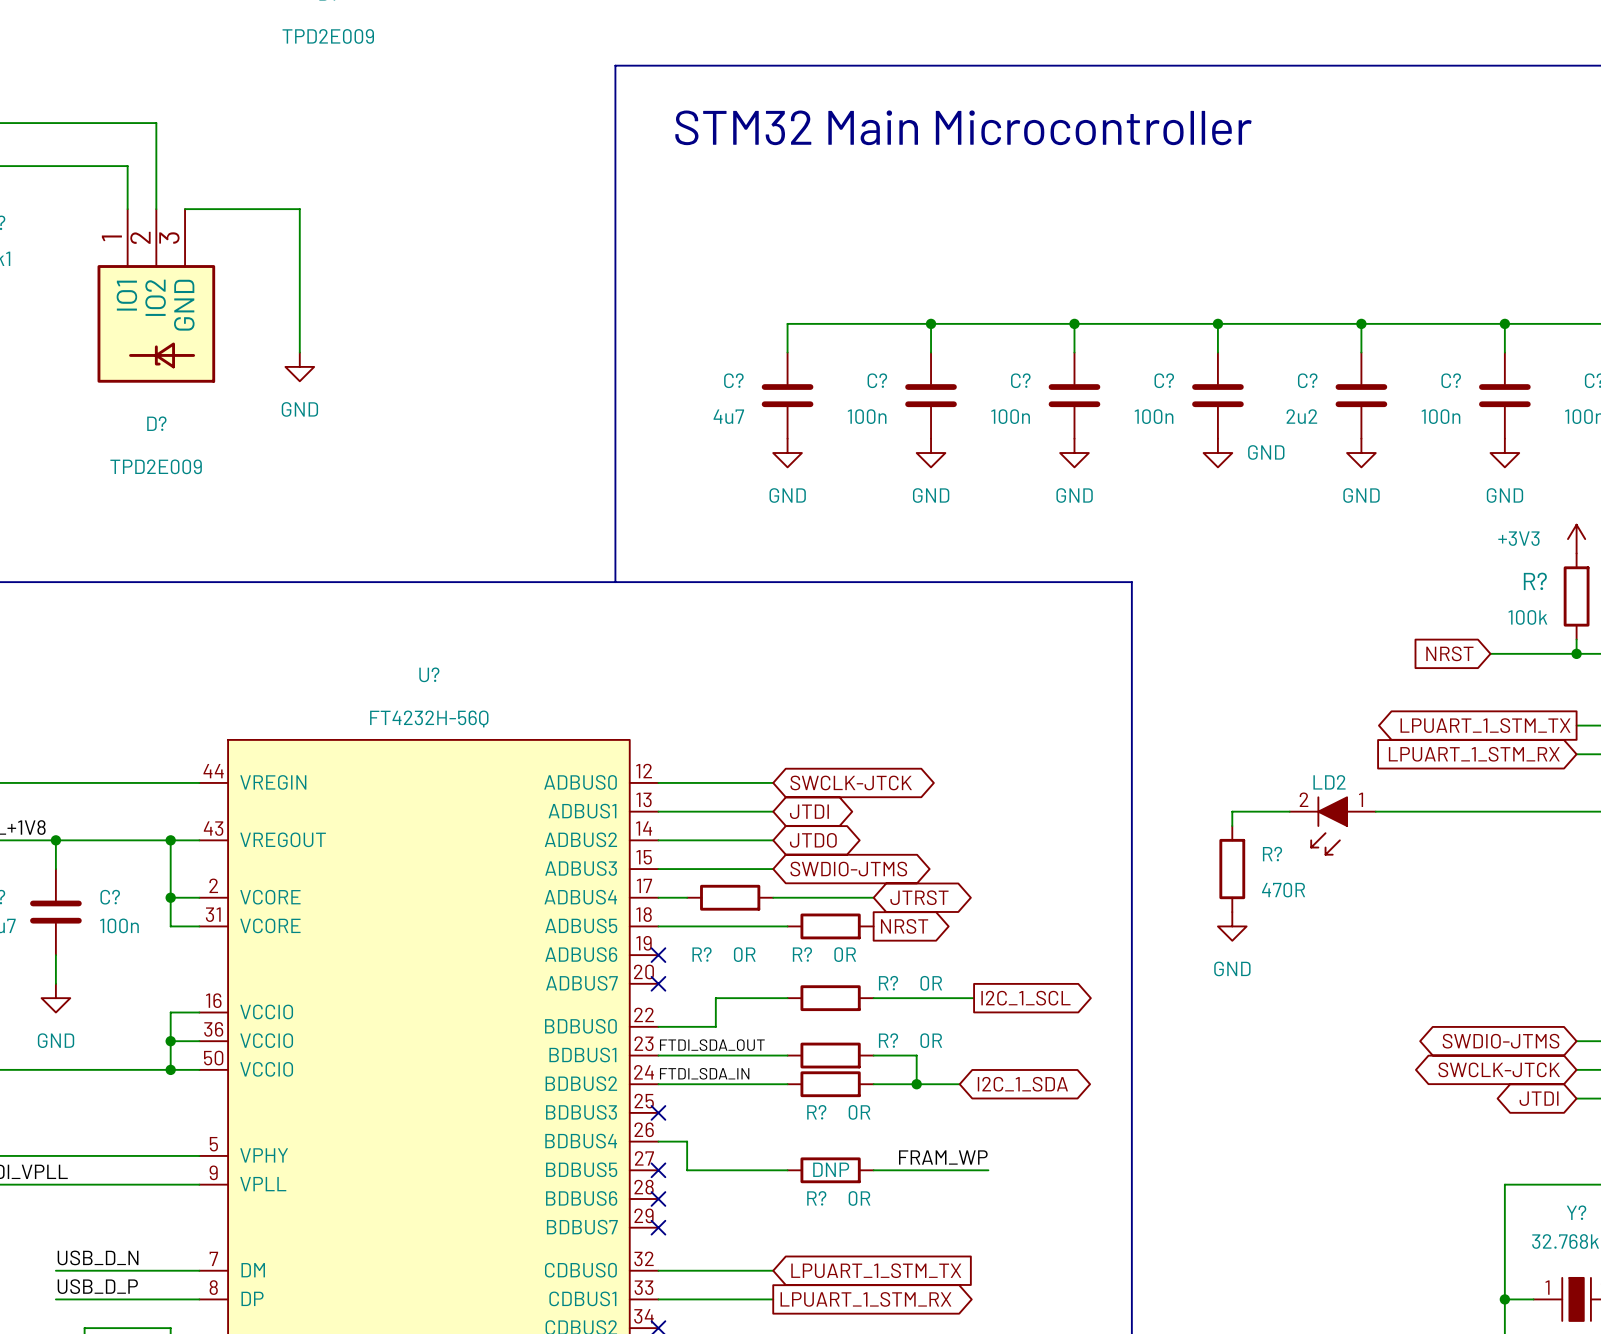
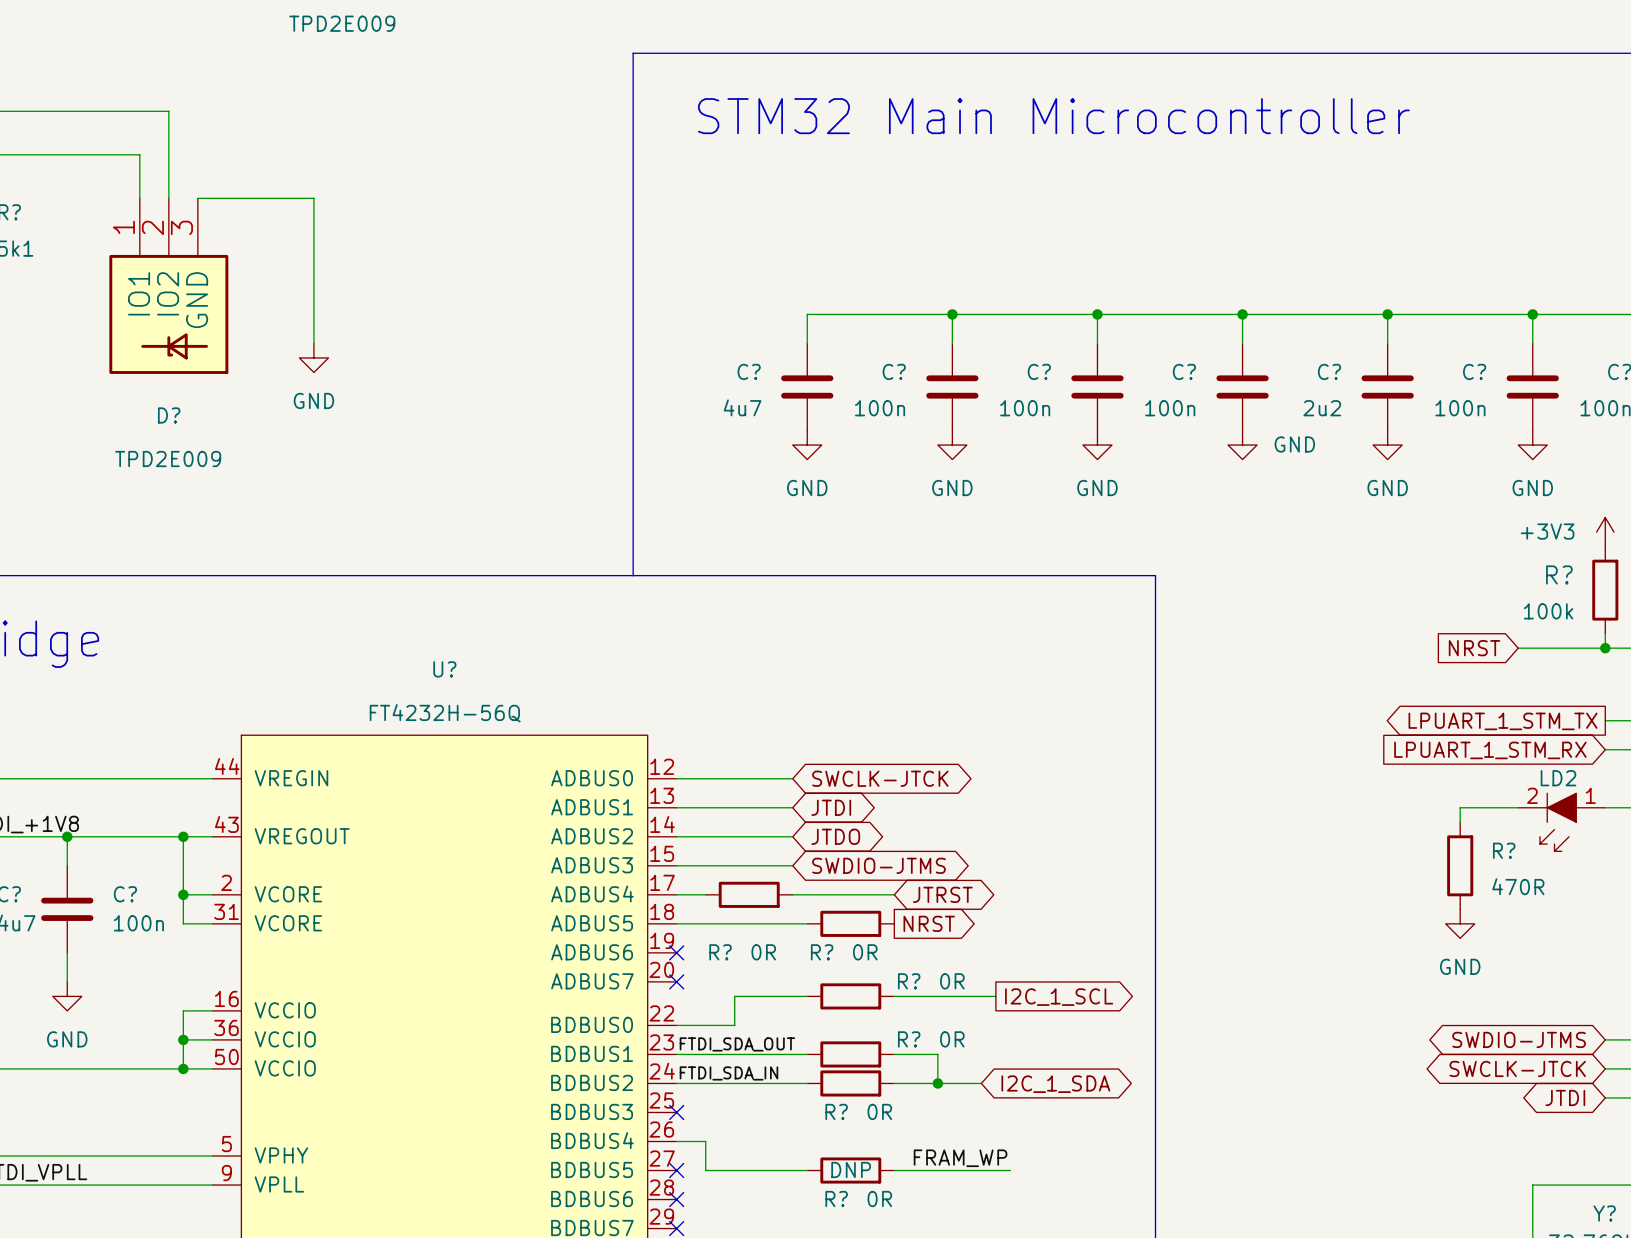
wire: (1289, 811) (1232, 811) (1232, 826) -> none
wire: (1375, 811) (1433, 811) -> (1460, 822) (1460, 807)
LD2 position: (1332, 826) -> (1561, 822)
R? position: (1232, 869) -> (1460, 865)
power symbol position: GND (1232, 926) -> GND (1460, 923)

